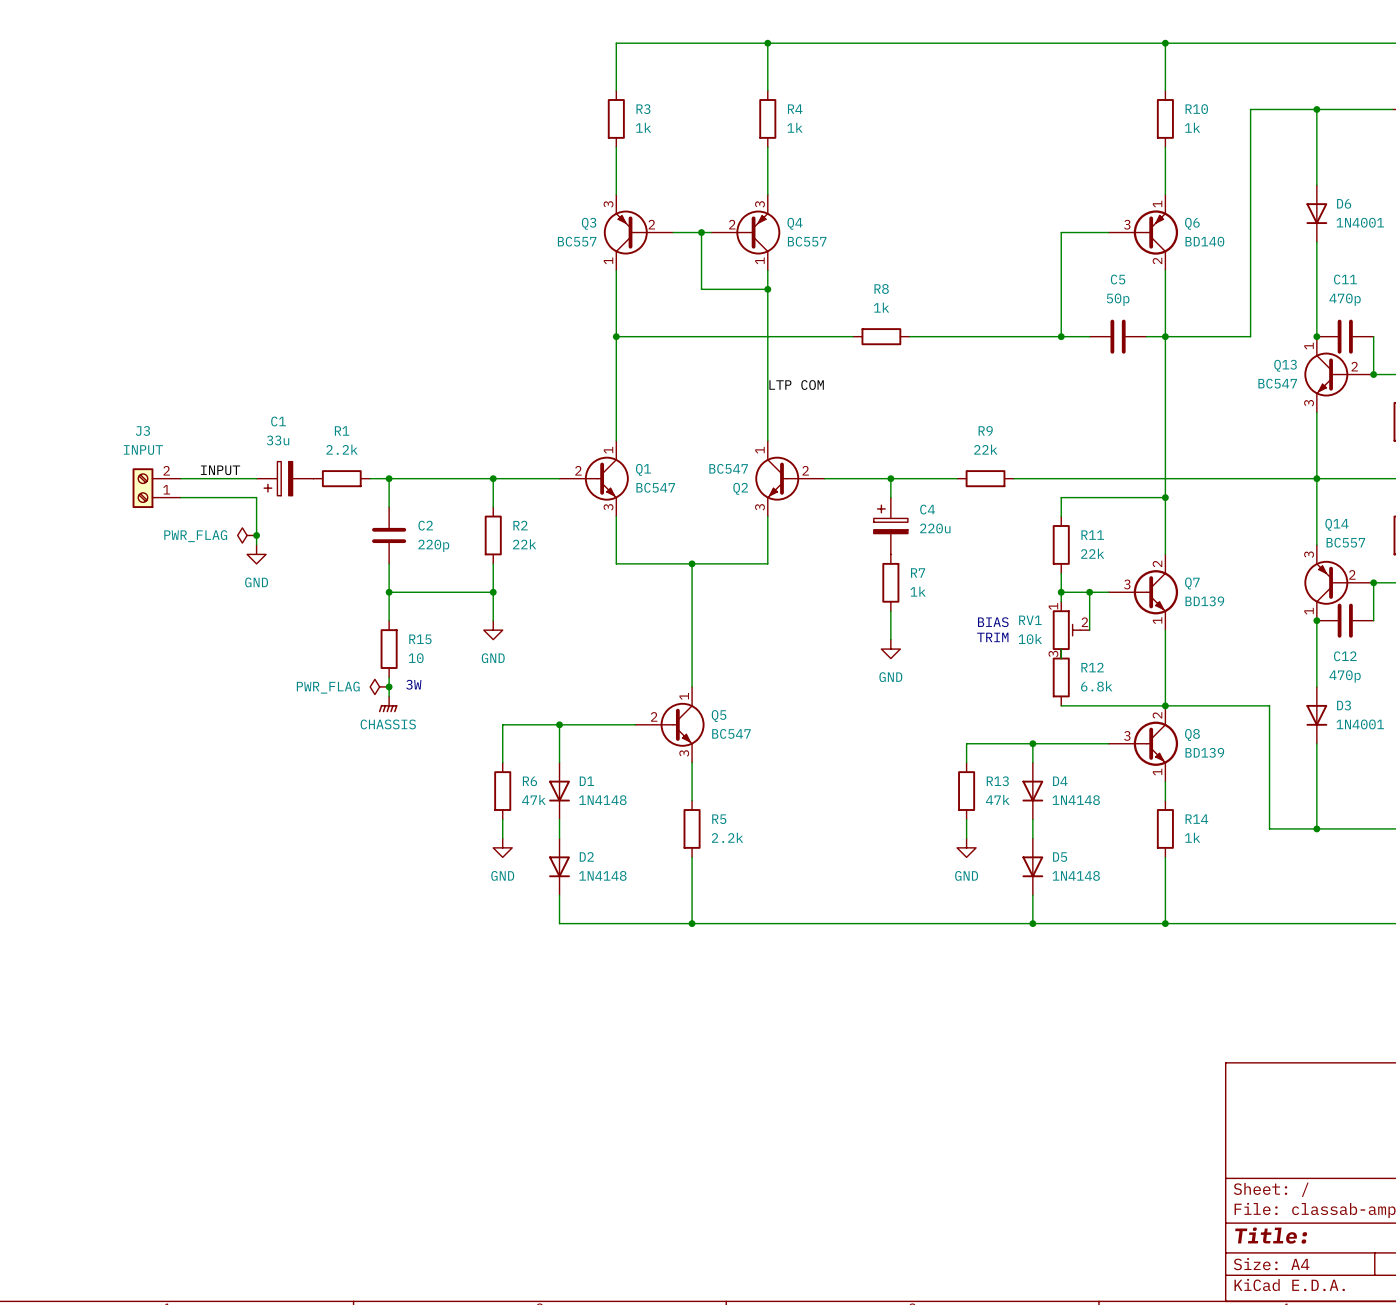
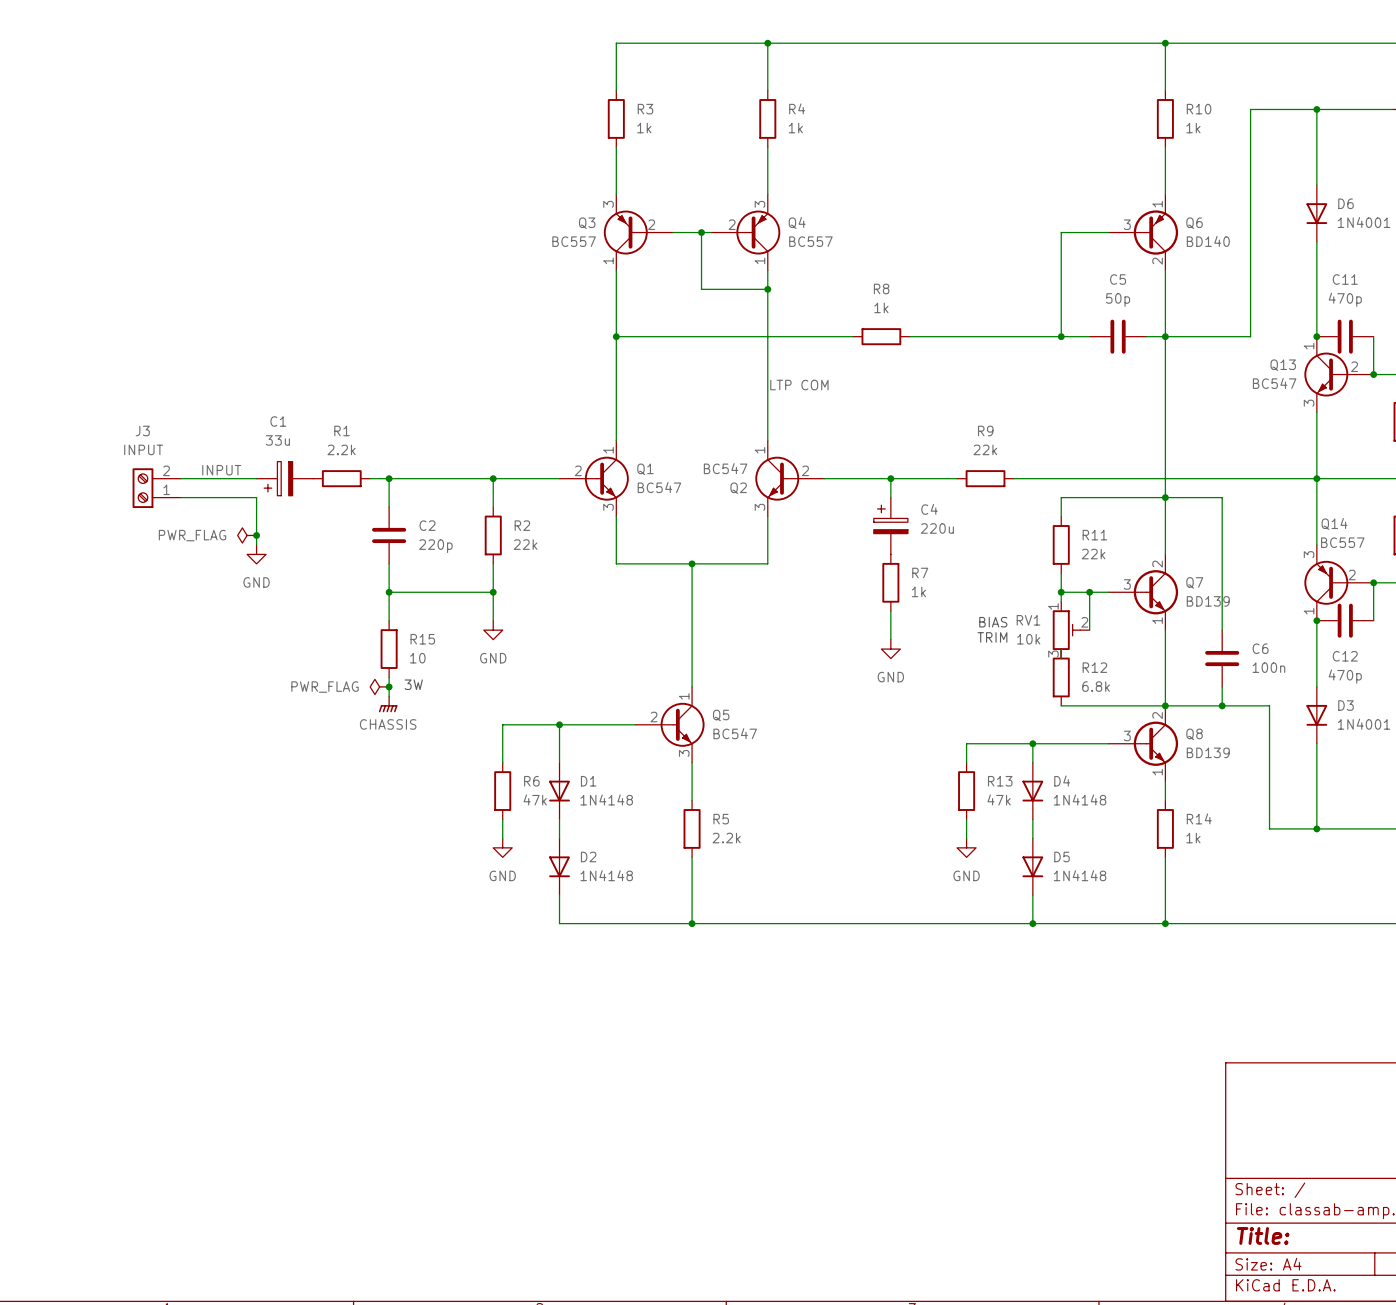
wire: none -> (1165, 497) (1222, 497) (1222, 630)
C6: none -> 100n (1222, 658)
wire: none -> (1222, 686) (1222, 705)
junction: none -> (1222, 705)

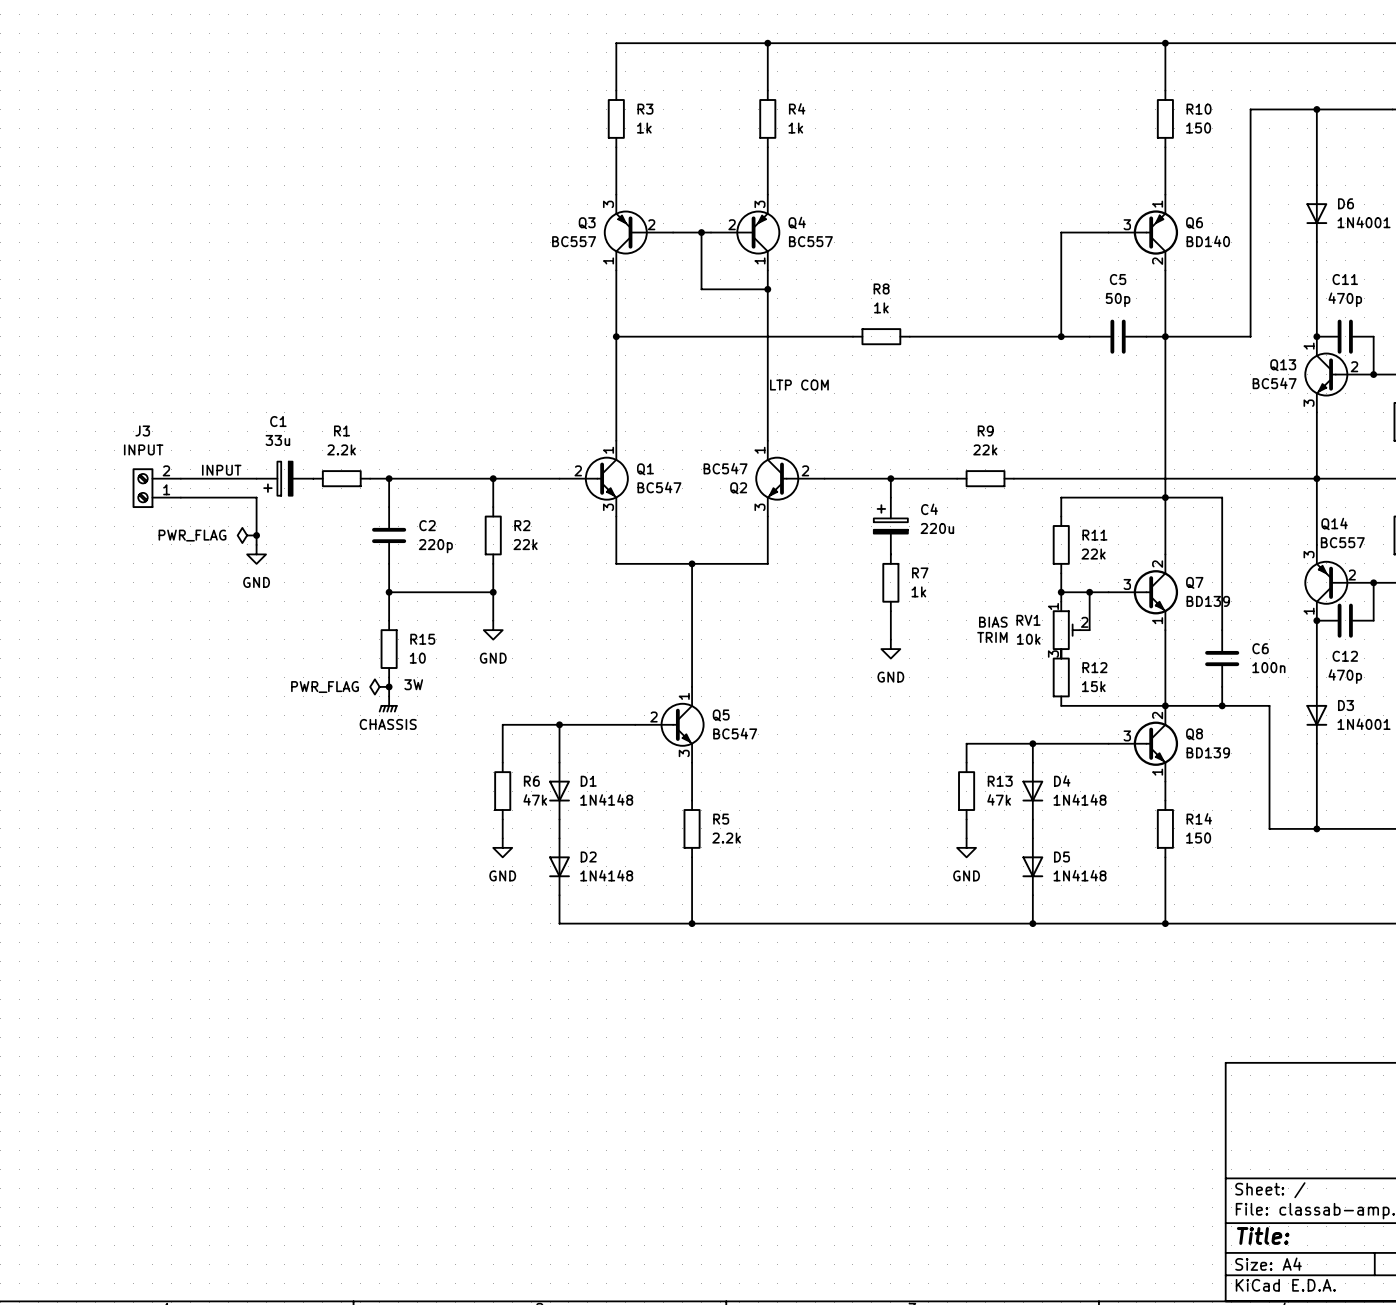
R10 value: 1k (1193, 128) -> 150 (1198, 128)
R12 value: 6.8k (1096, 686) -> 15k (1093, 686)
R14 value: 1k (1193, 838) -> 150 (1198, 838)

